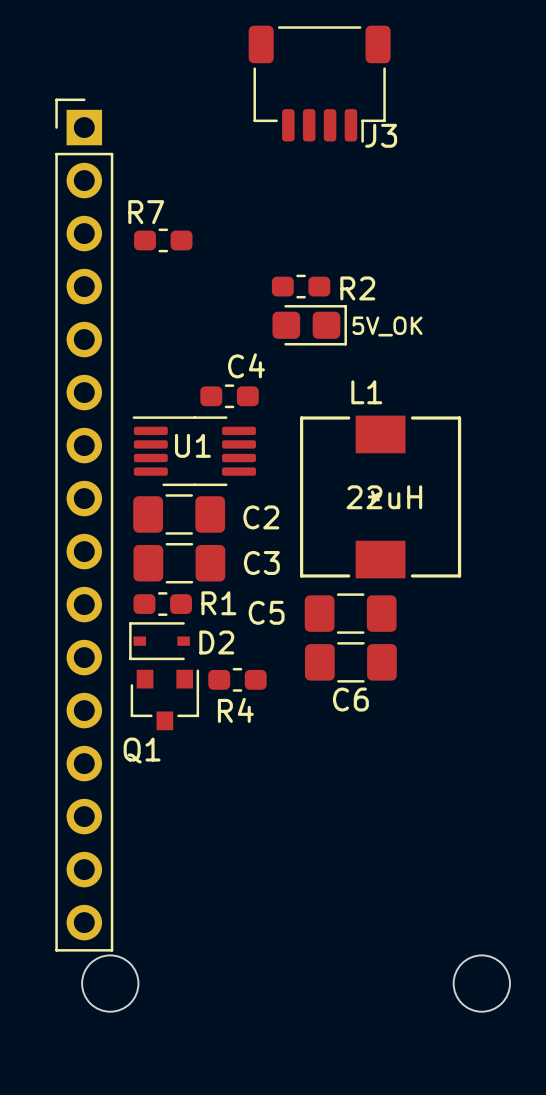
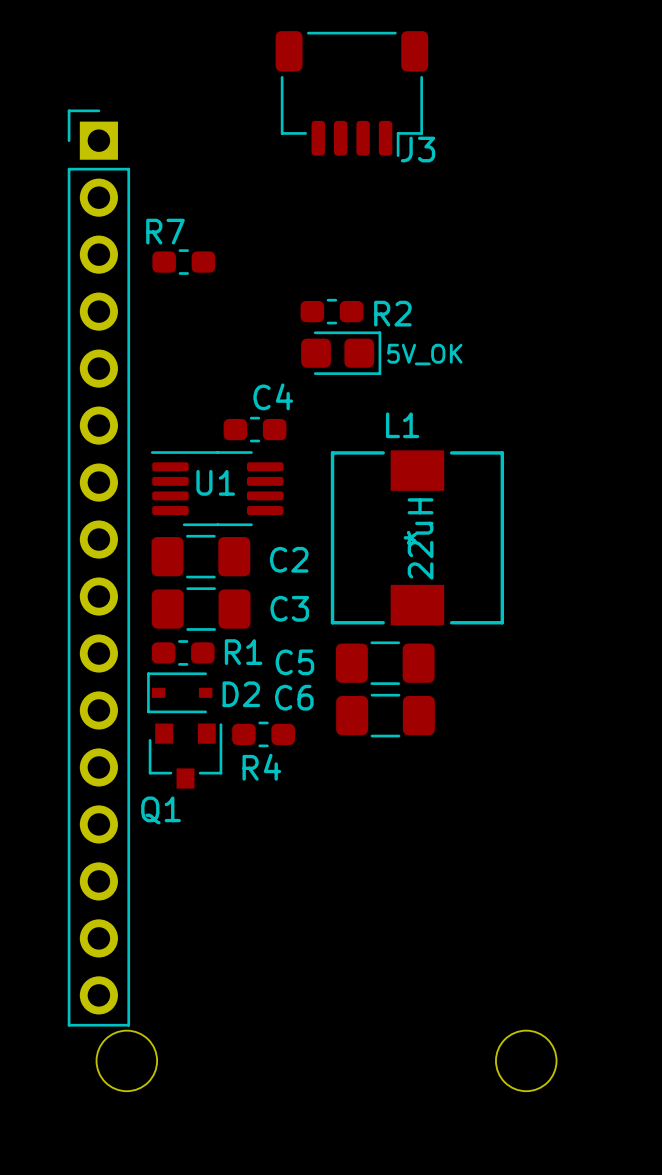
L1 value rotation: 0° (384, 497) -> 90° counterclockwise (420, 538)
C6 name position: C6 (350, 699) -> C6 (294, 697)

